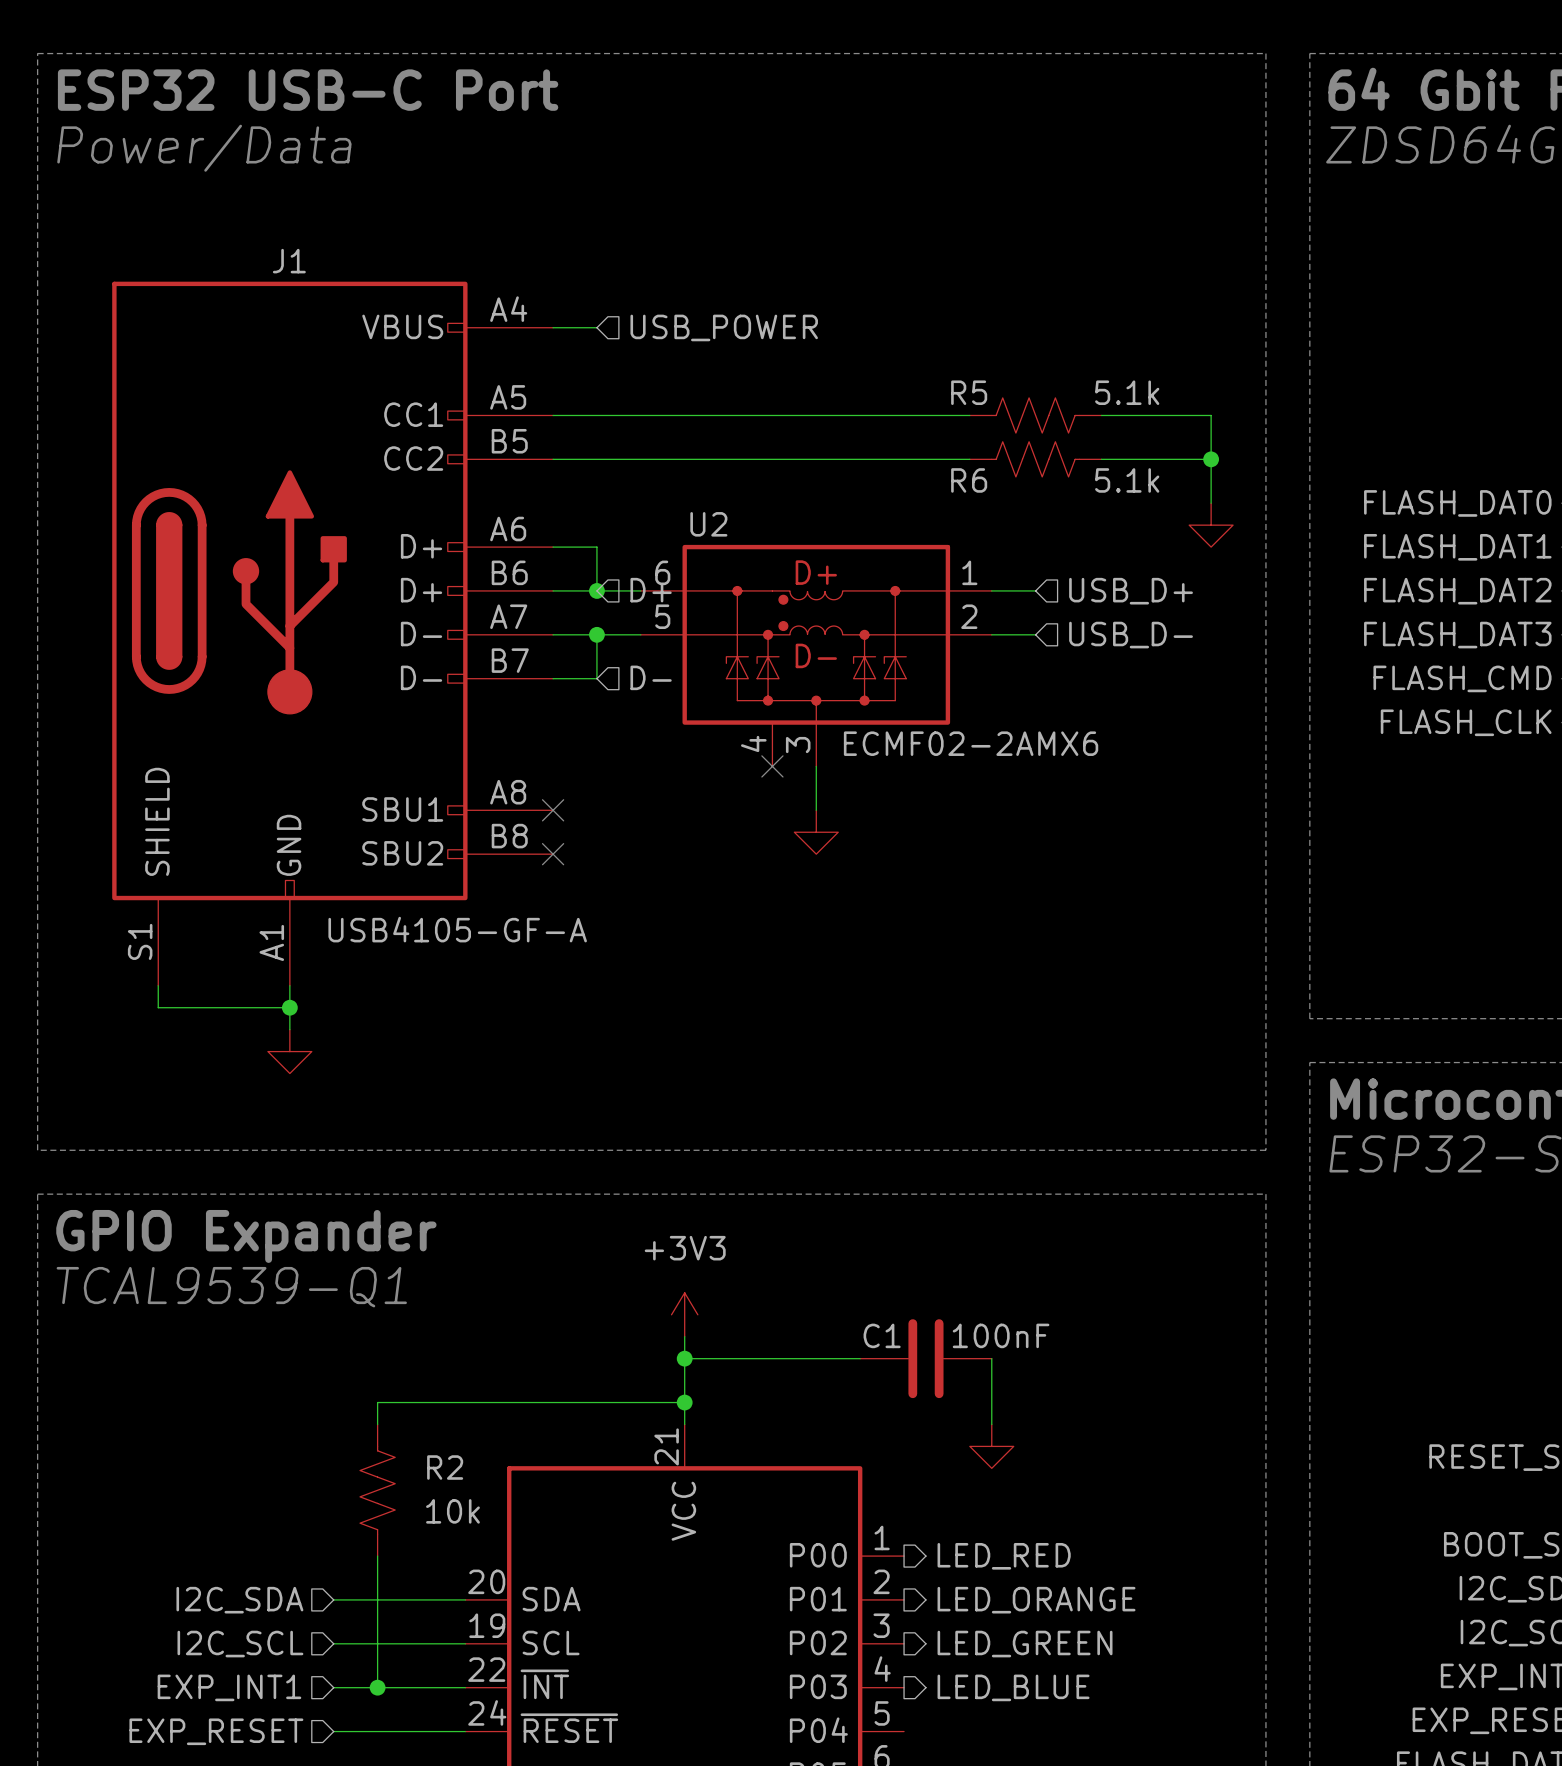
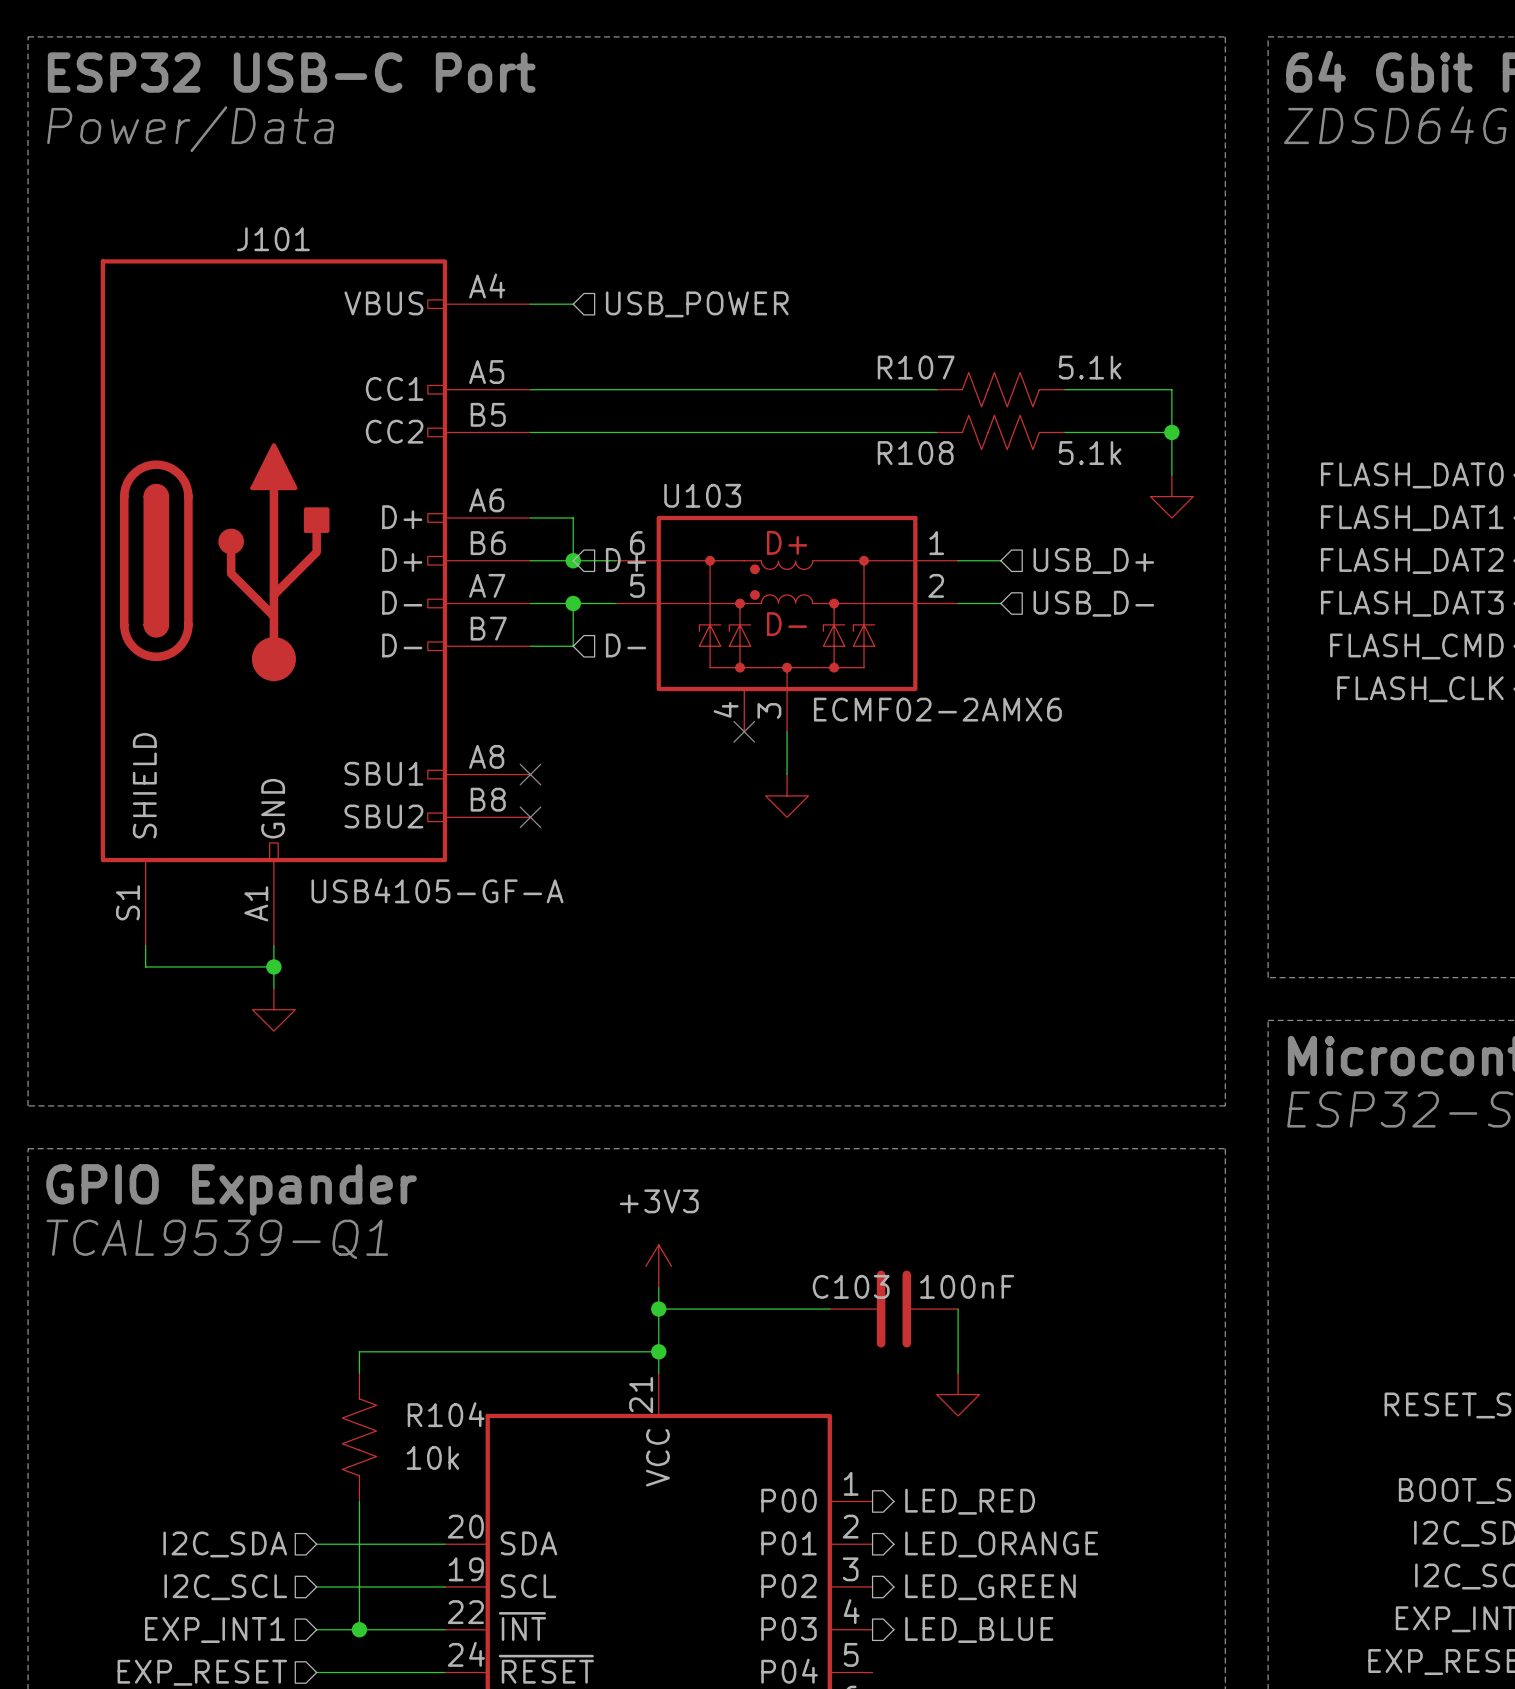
J1 name: J1 (289, 261) -> J101 (273, 239)
R5 name: R5 (969, 392) -> R107 (916, 367)
R6 name: R6 (969, 480) -> R108 (915, 453)
U2 name: U2 (708, 524) -> U103 (702, 495)
C1 name: C1 (882, 1335) -> C103 (851, 1286)
R2 name: R2 (445, 1467) -> R104 (446, 1414)

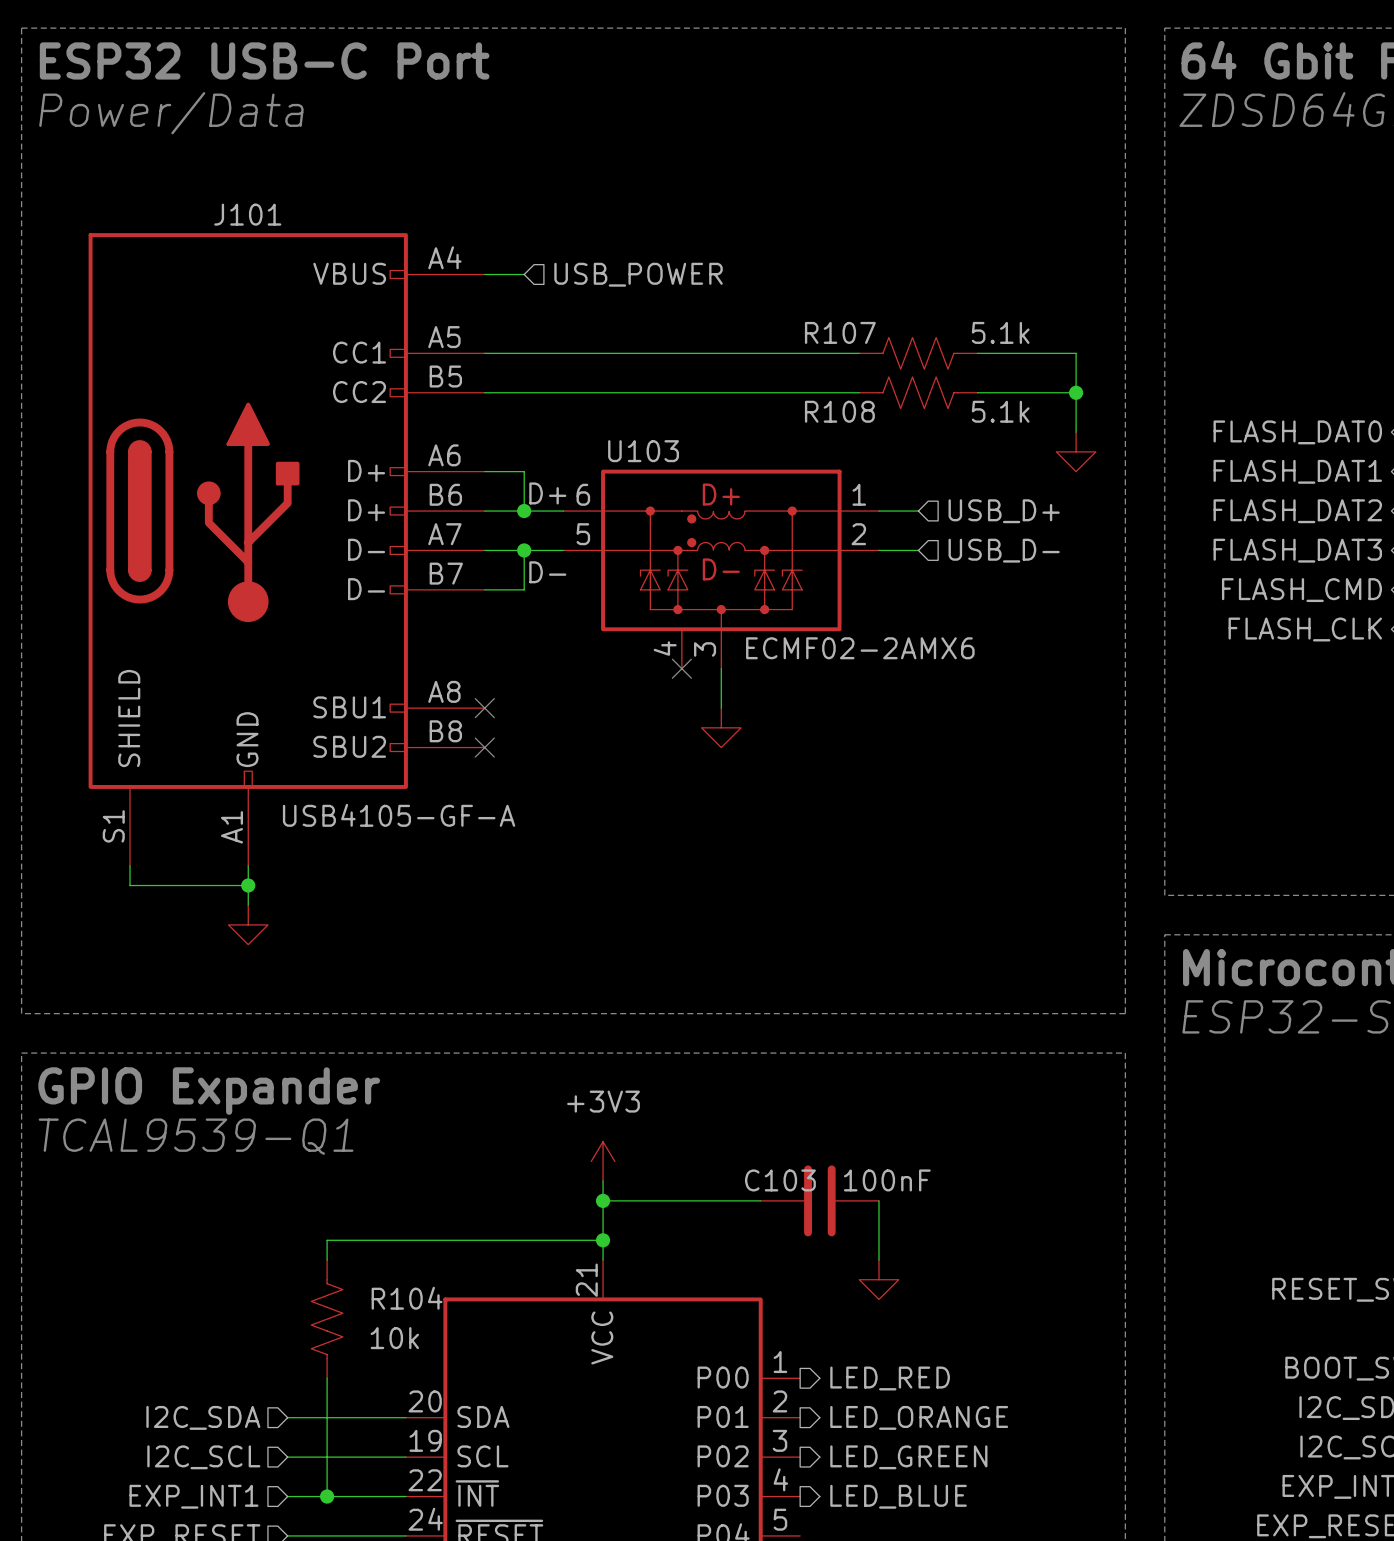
label: none -> D+ (547, 493)
hierarchical label: D+ (626, 559) -> none
label: none -> D- (547, 572)
hierarchical label: D- (626, 645) -> none

